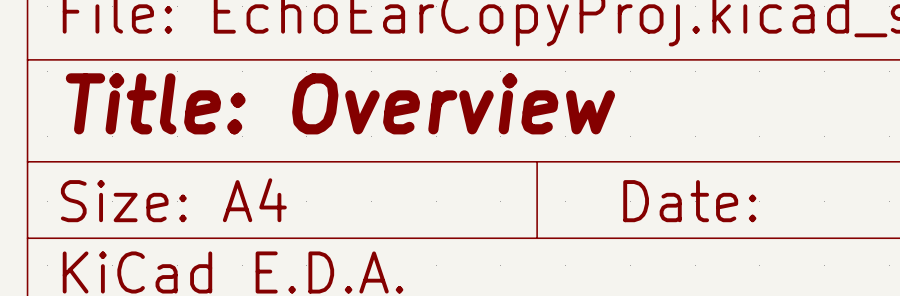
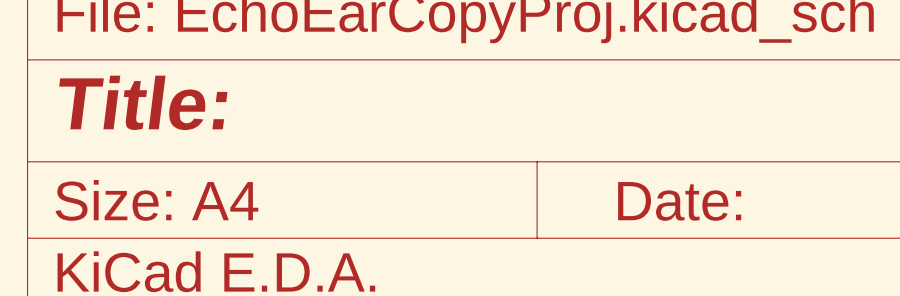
title block: Title: Overview (340, 103) -> Title: (143, 102)

